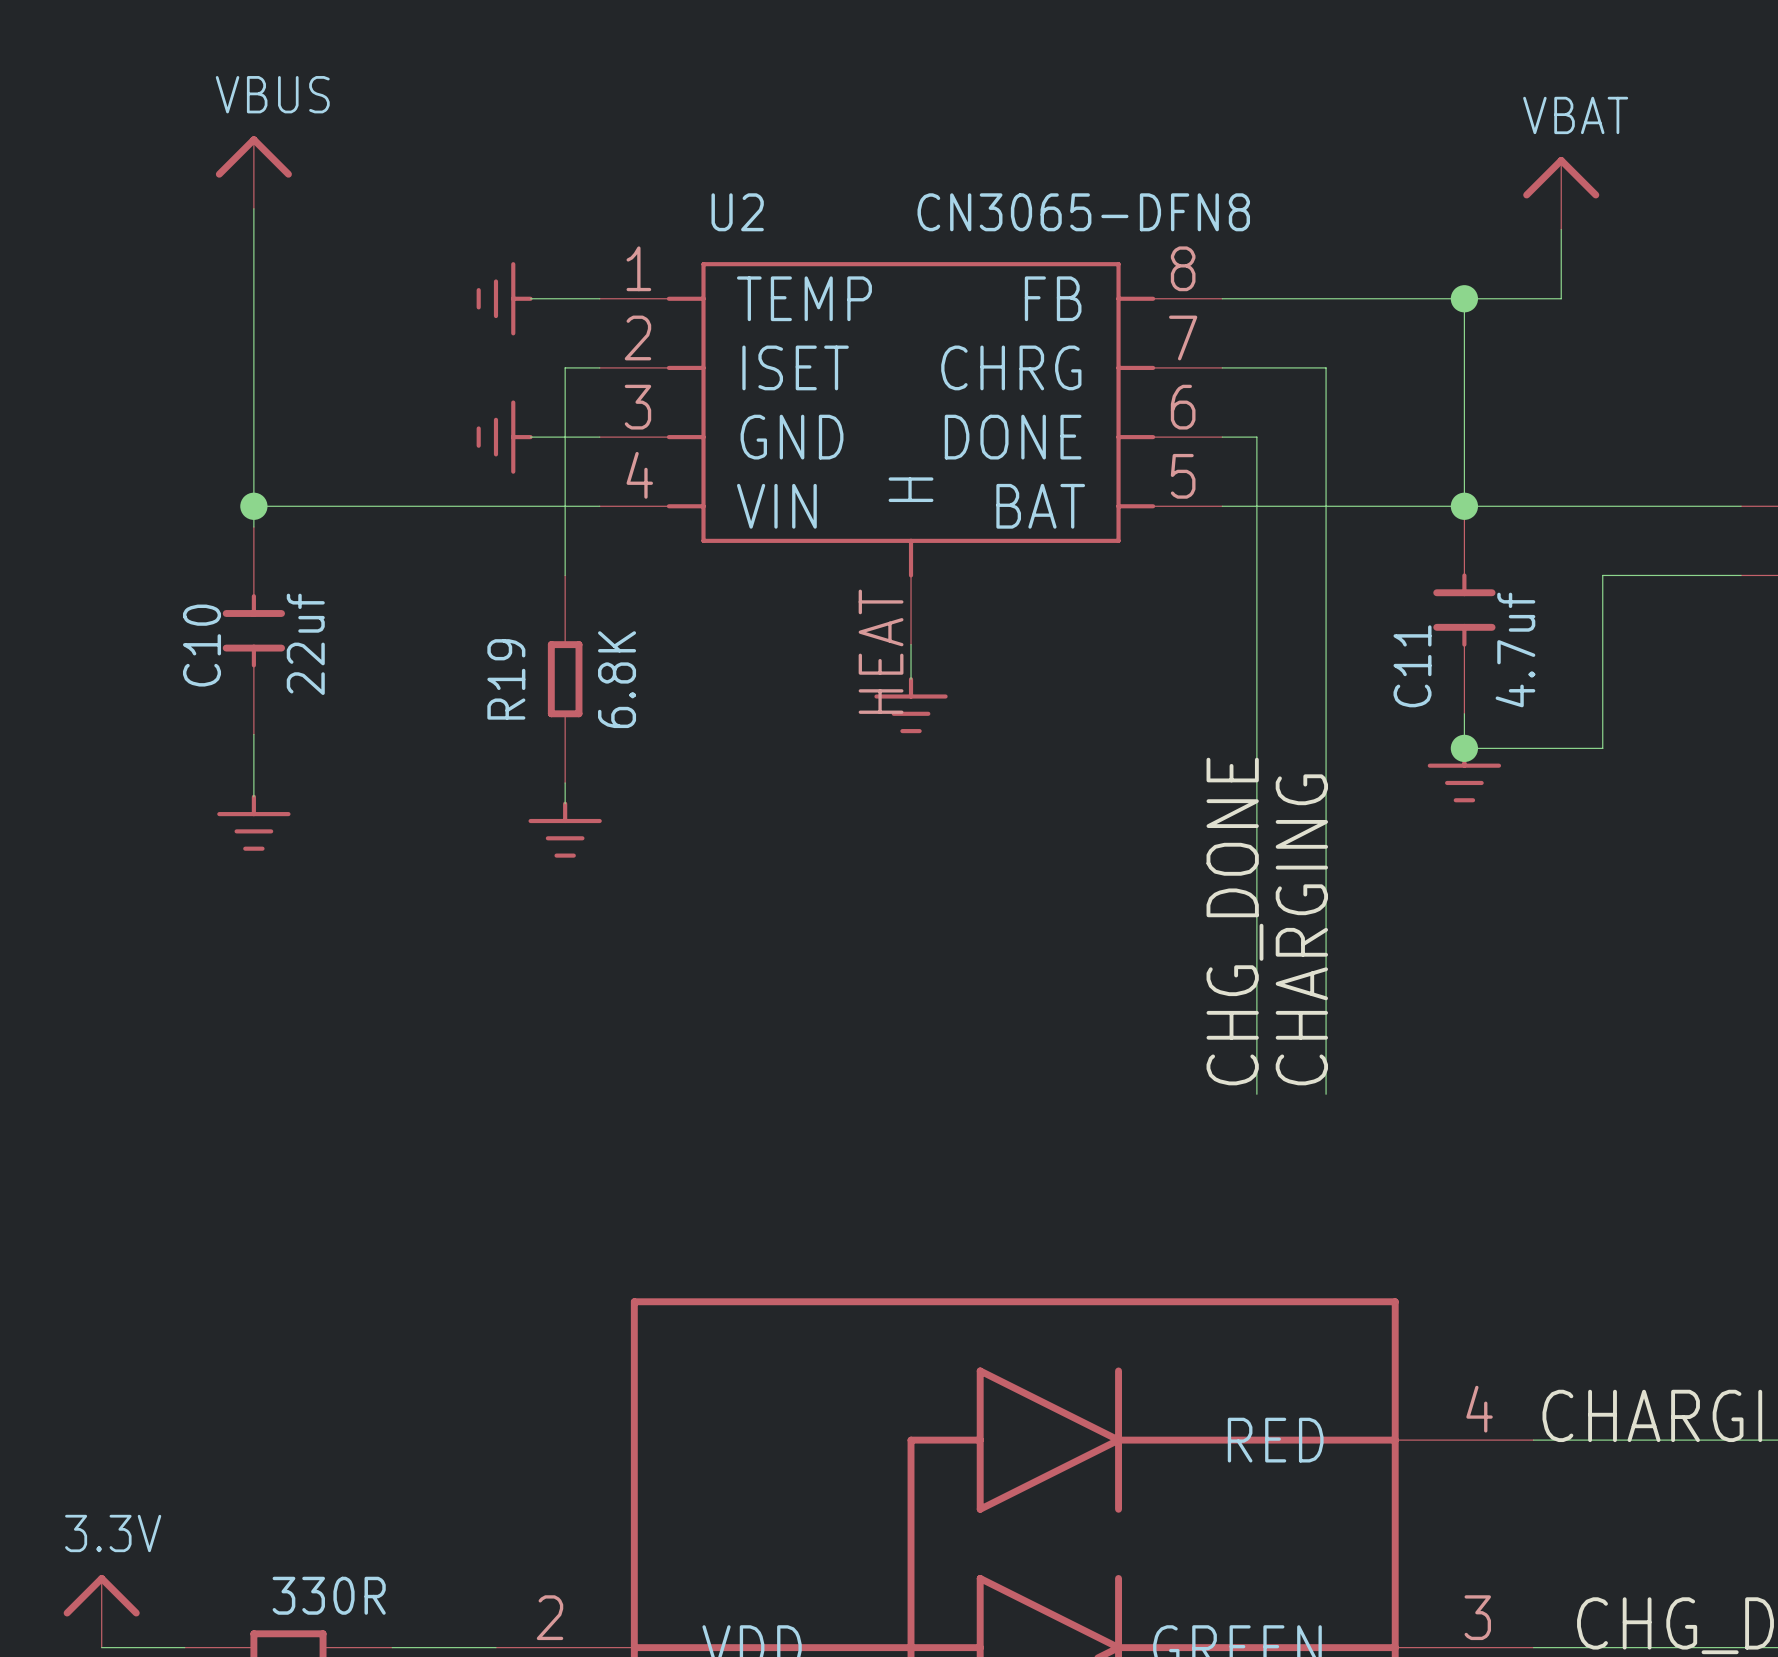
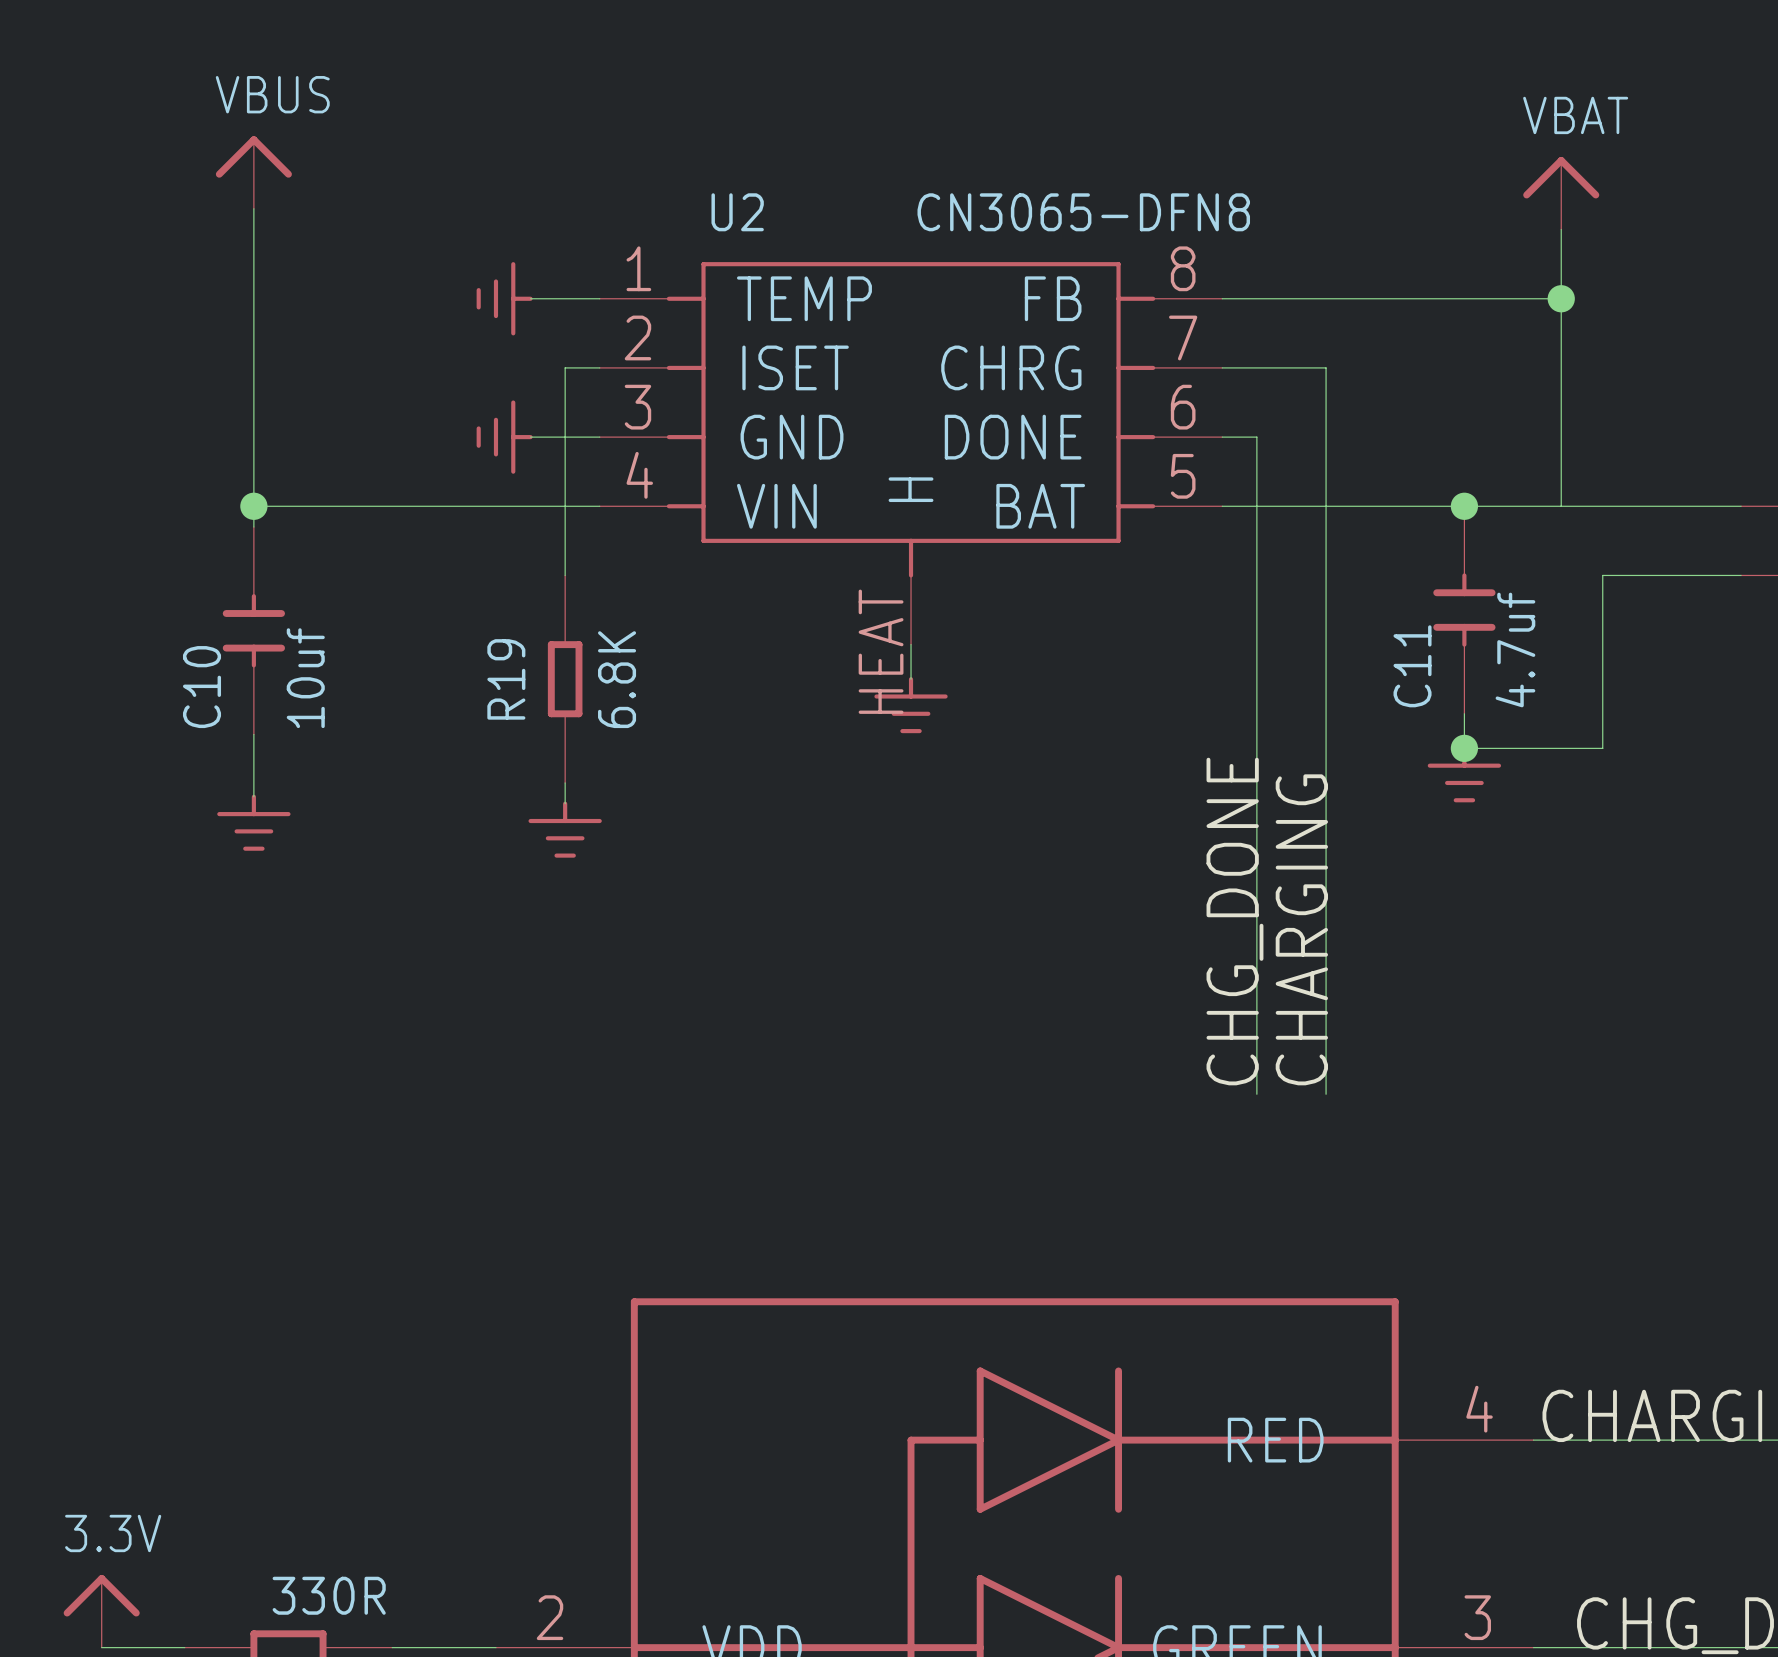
wire: (1464, 298) (1464, 506) -> (1561, 298) (1561, 506)
junction position: (1464, 298) -> (1561, 298)
C10 value: 22uf (305, 644) -> 10uf (305, 678)
C10 name position: C10 (202, 645) -> C10 (202, 687)

